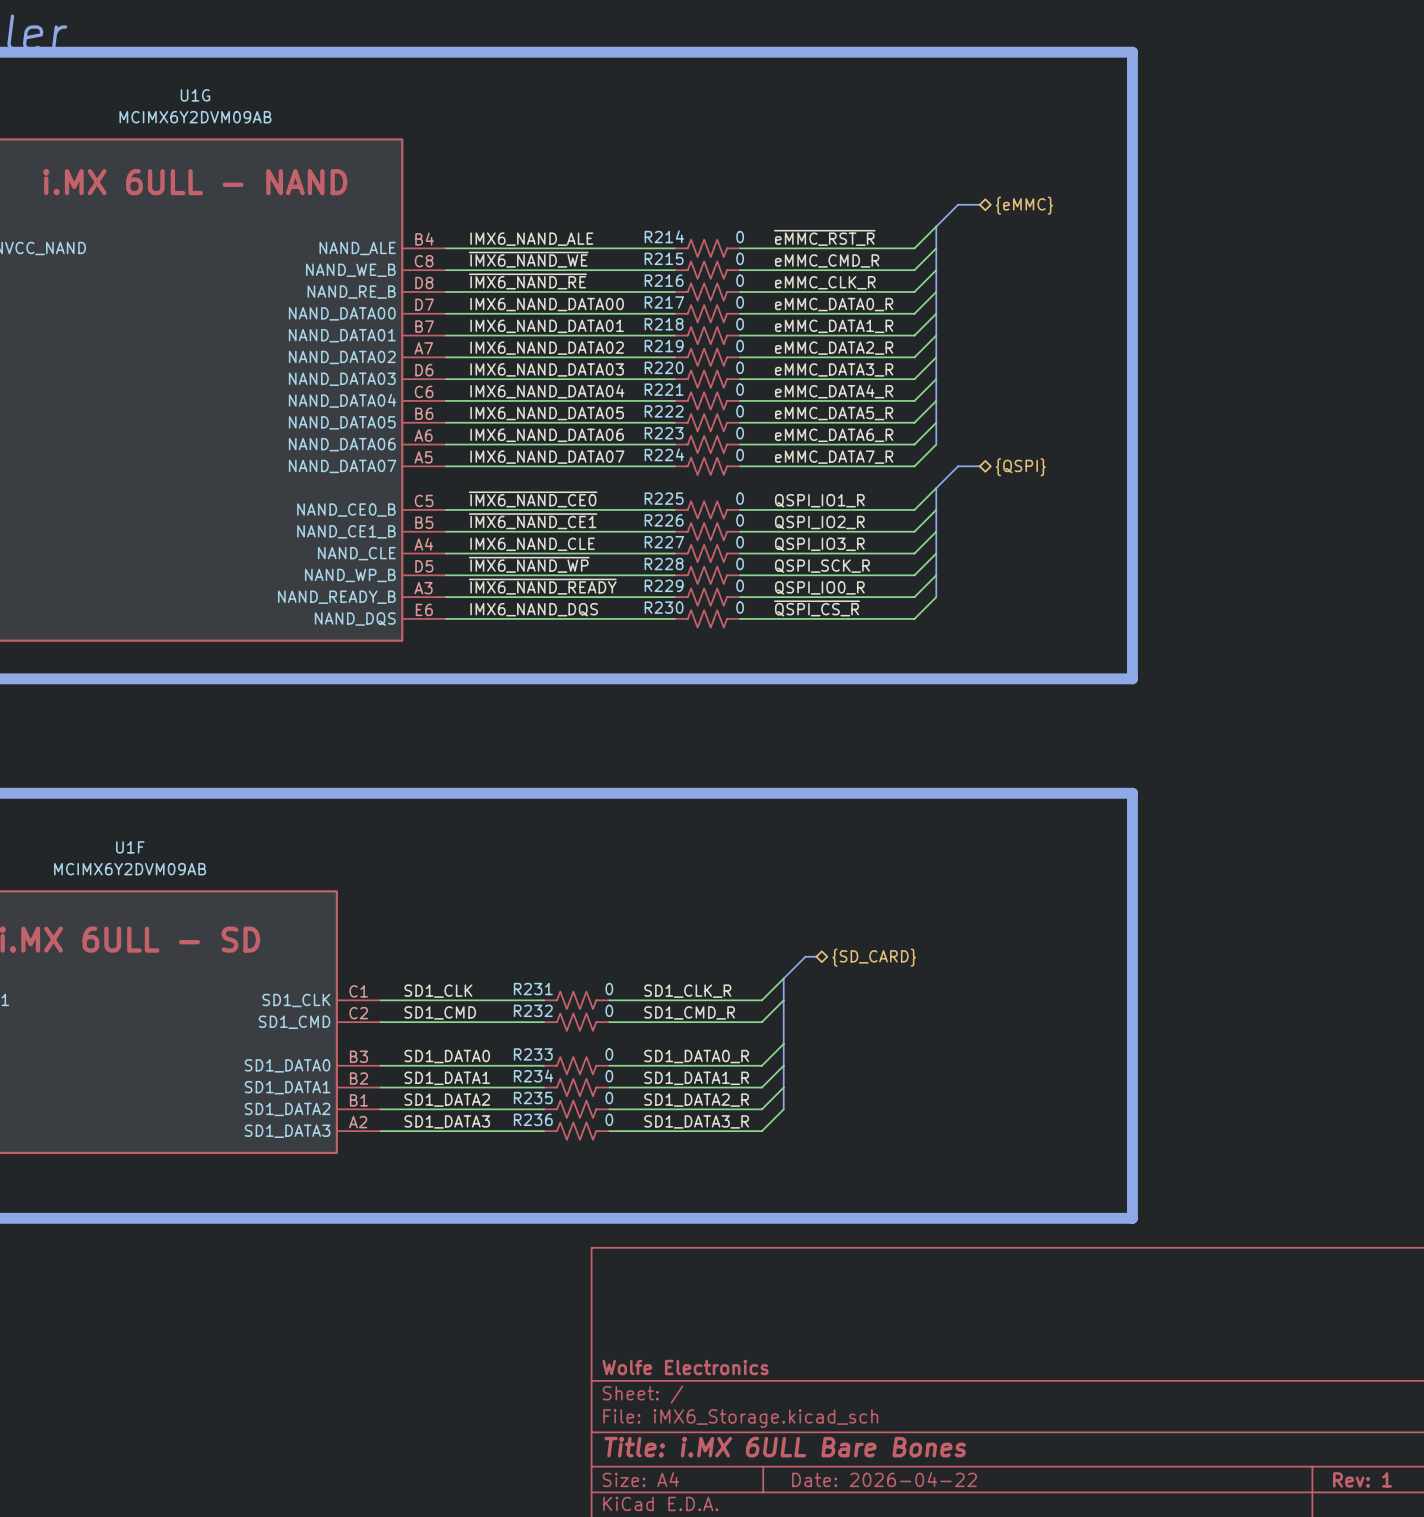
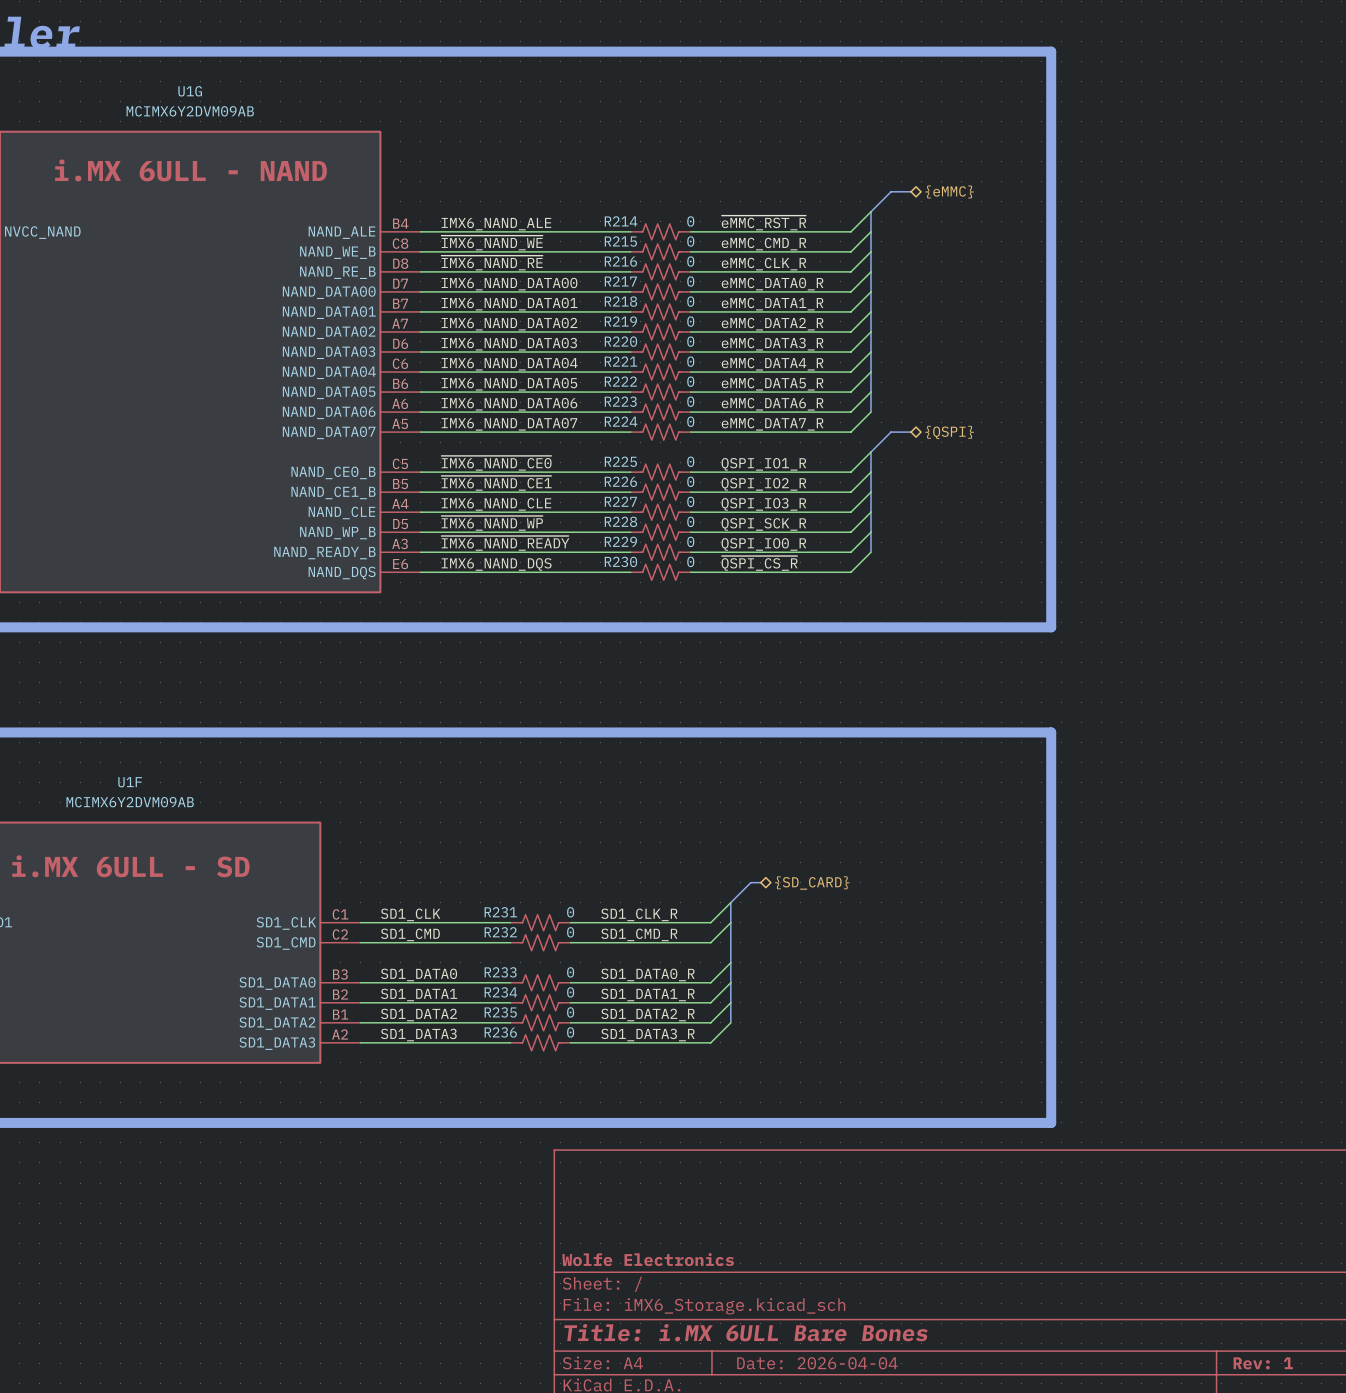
title block: Date: 2026-04-22 (884, 1479) -> Date: 2026-04-04 (817, 1363)

